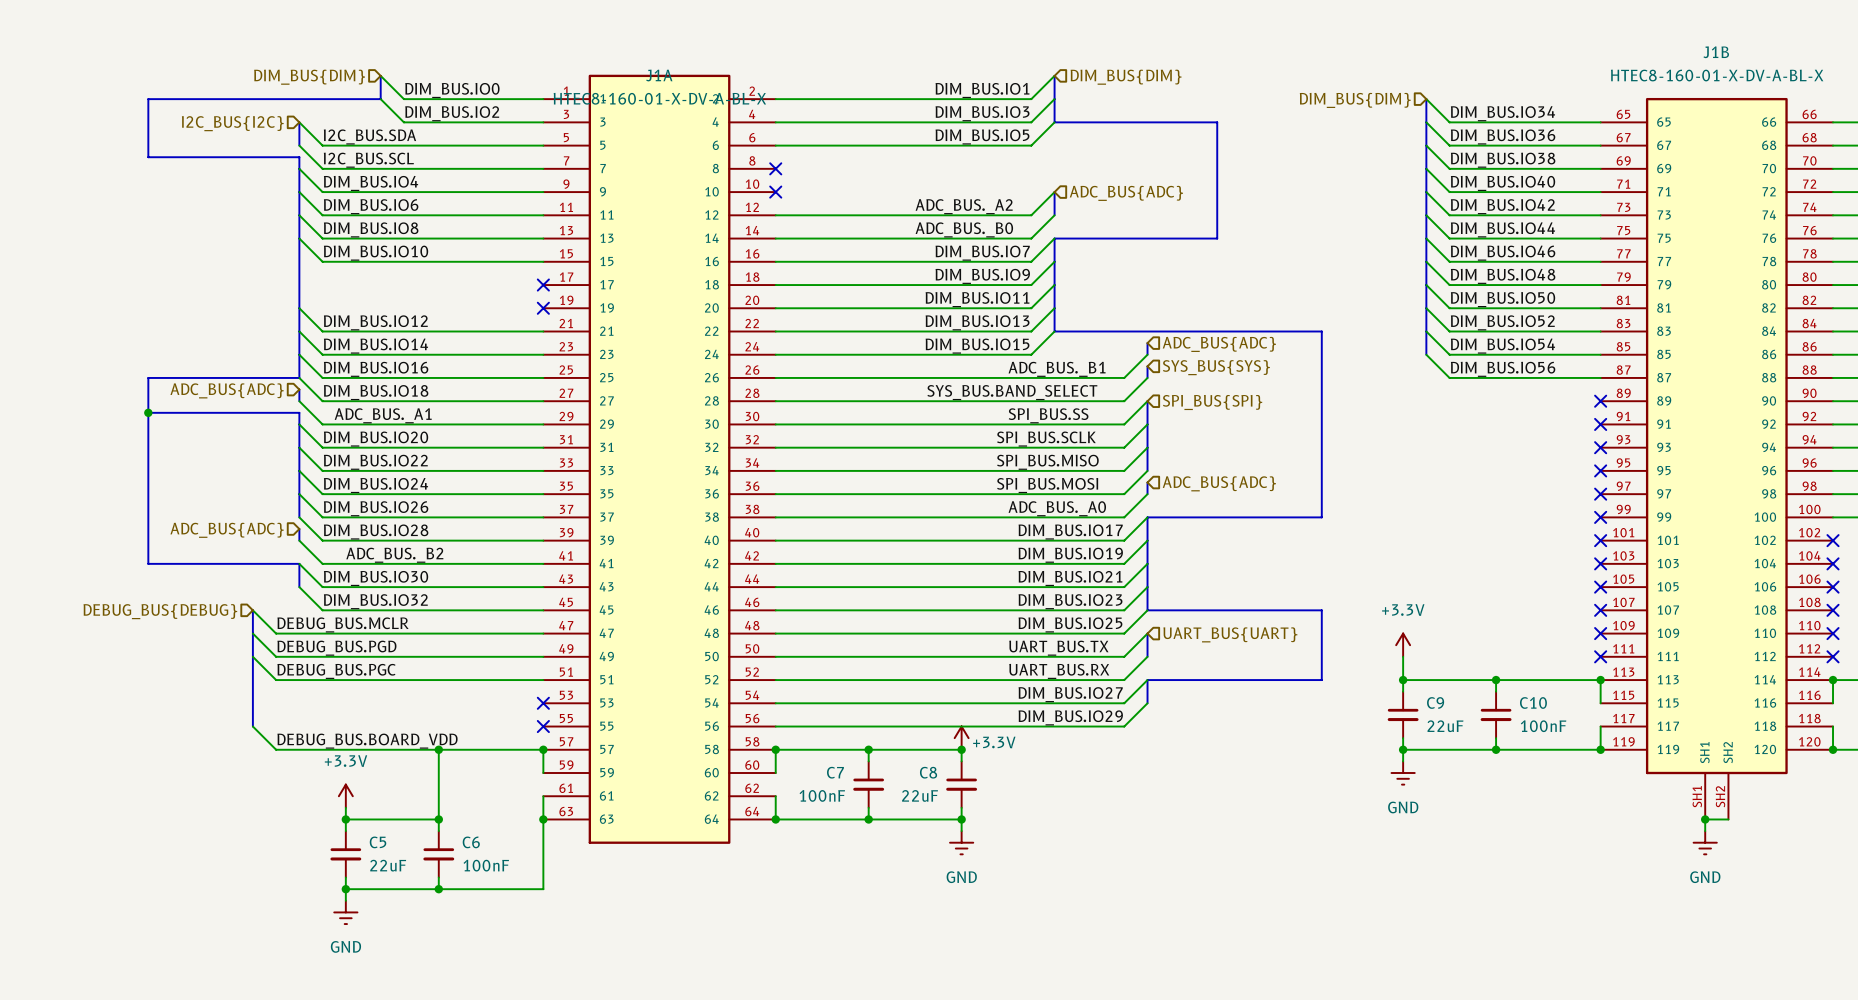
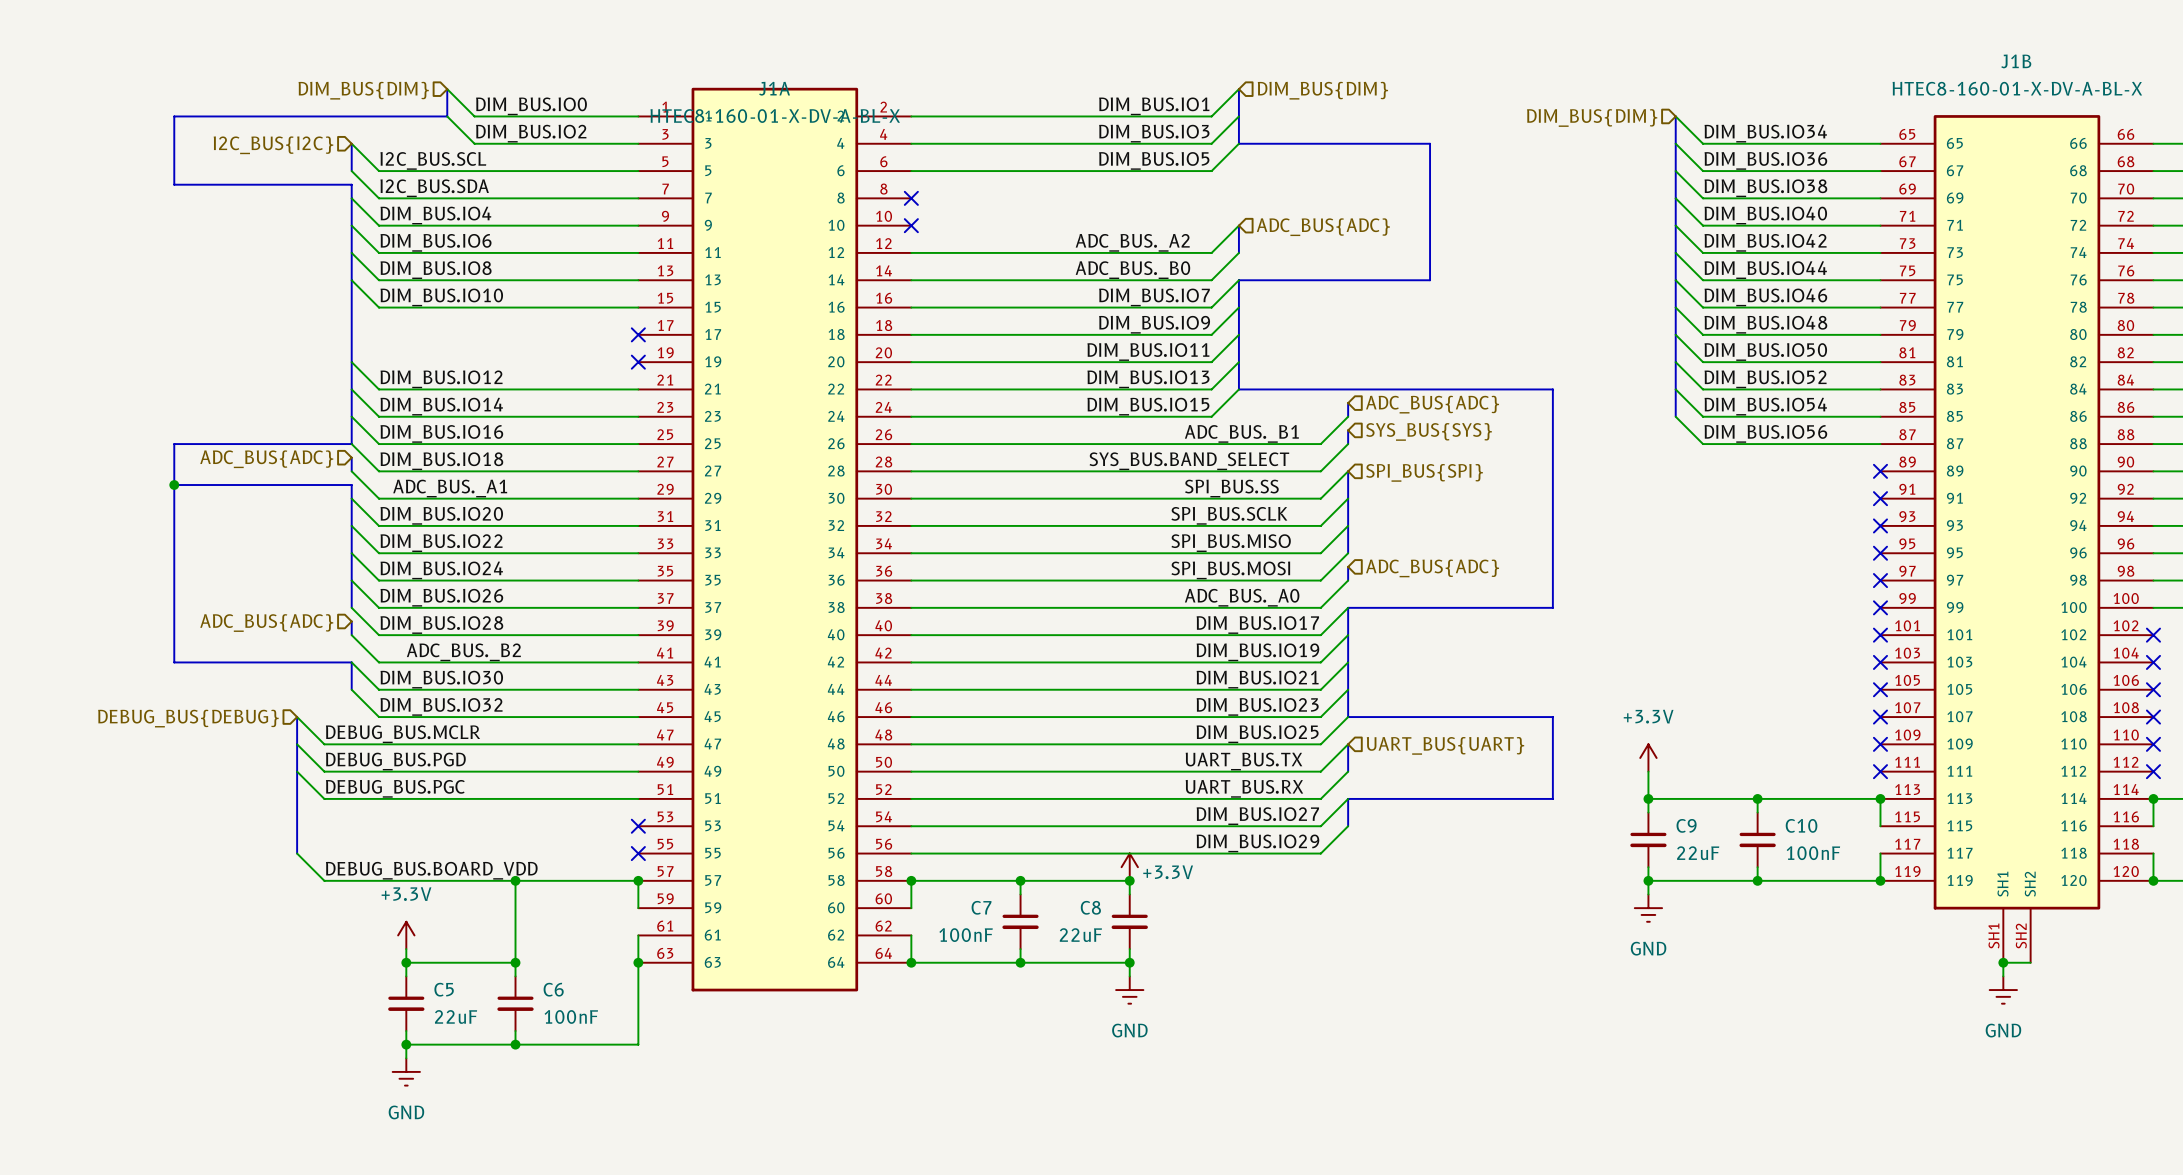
label: I2C_BUS.SDA (369, 136) -> I2C_BUS.SCL (433, 160)
label: I2C_BUS.SCL (368, 160) -> I2C_BUS.SDA (434, 188)

